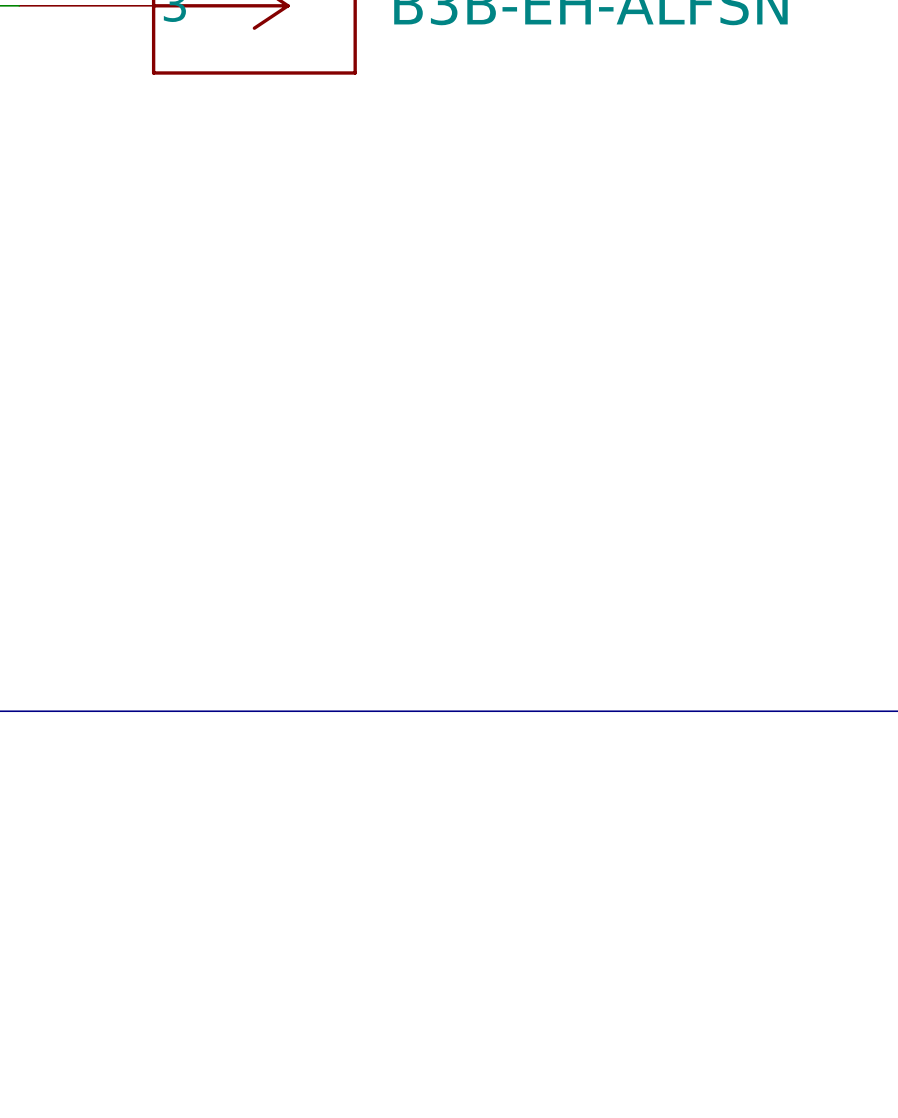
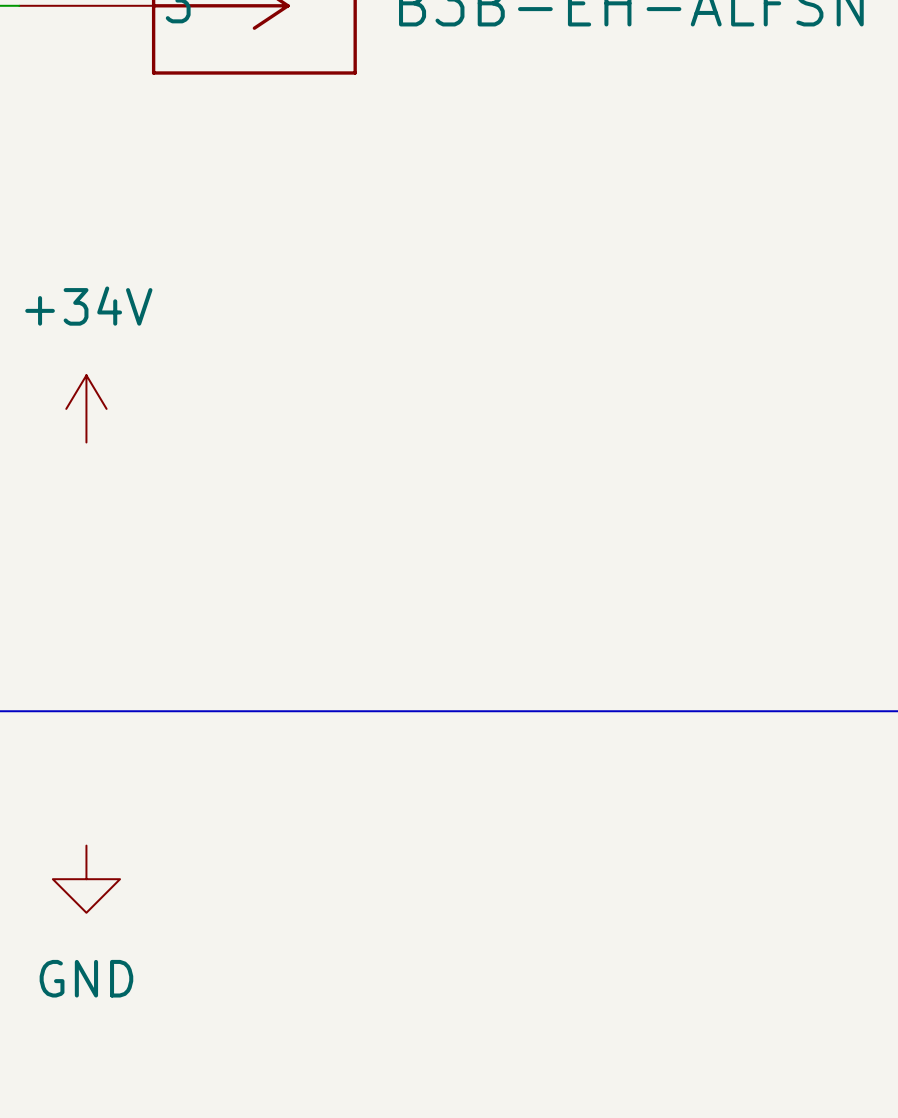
power symbol: none -> +34V (86, 408)
power symbol: none -> GND (86, 879)

